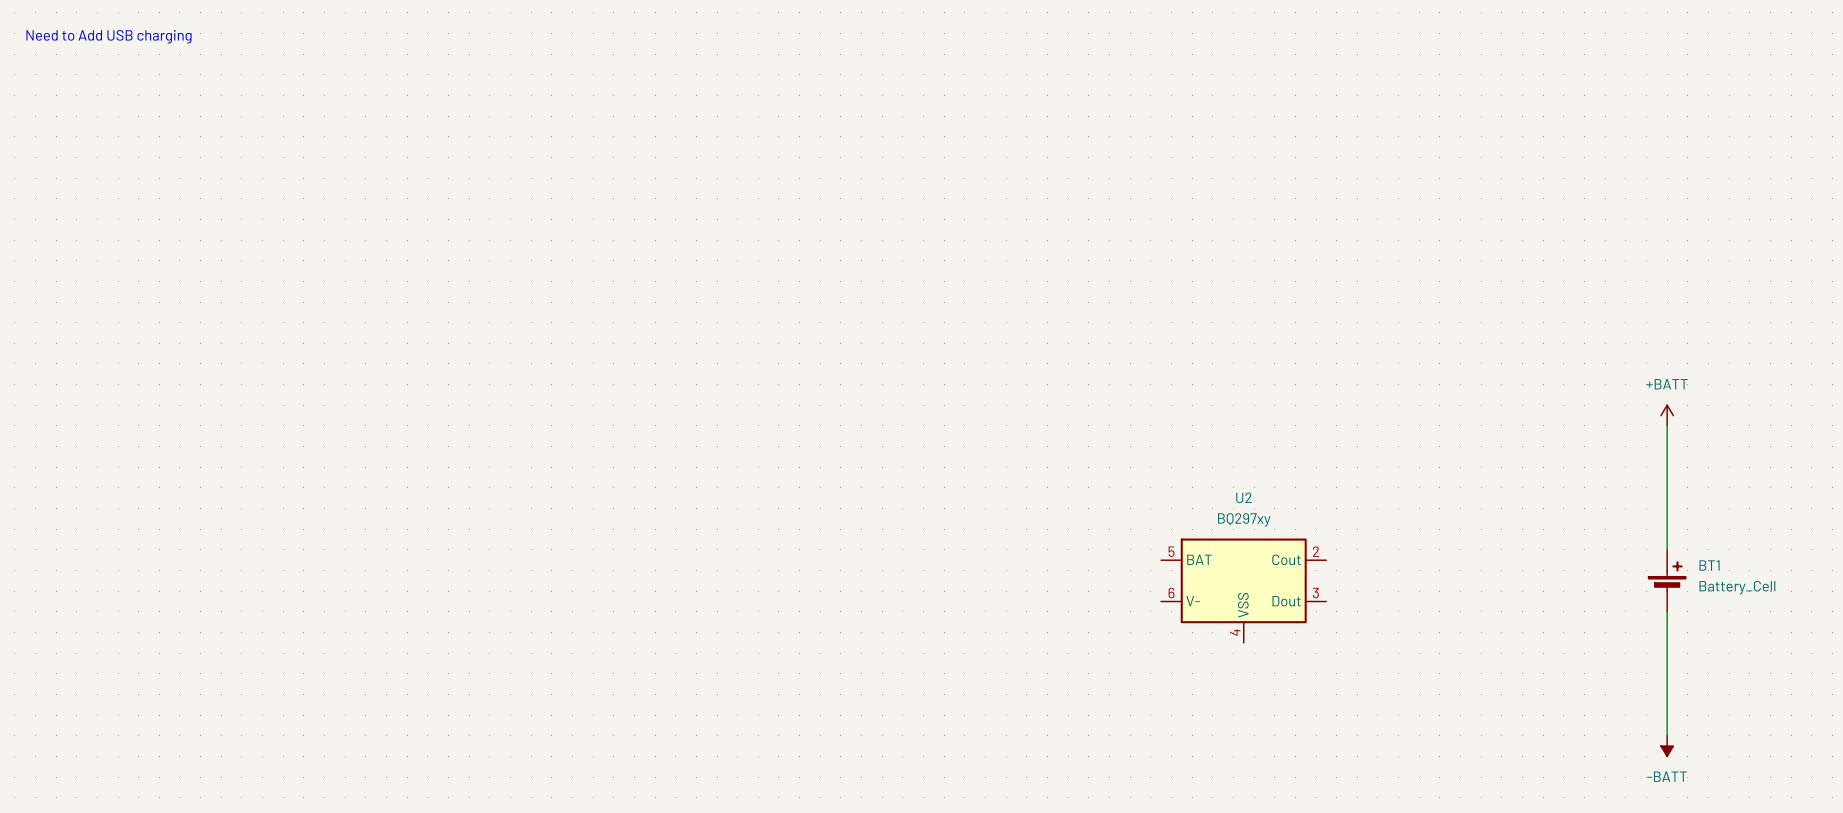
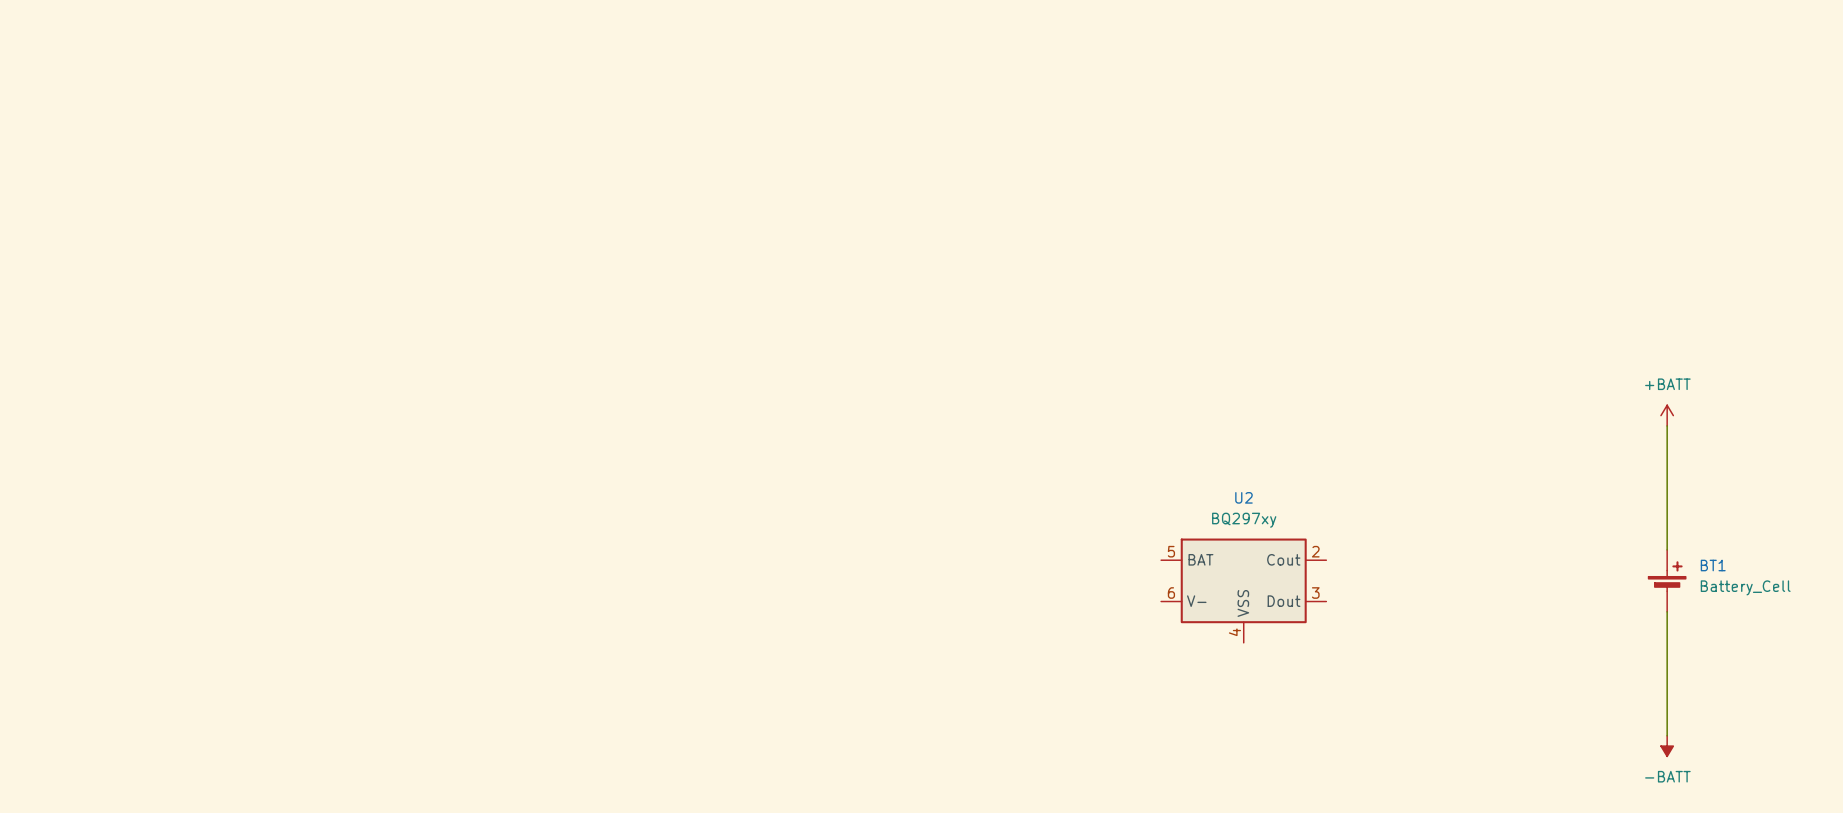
text: Need to Add USB charging (108, 36) -> none

